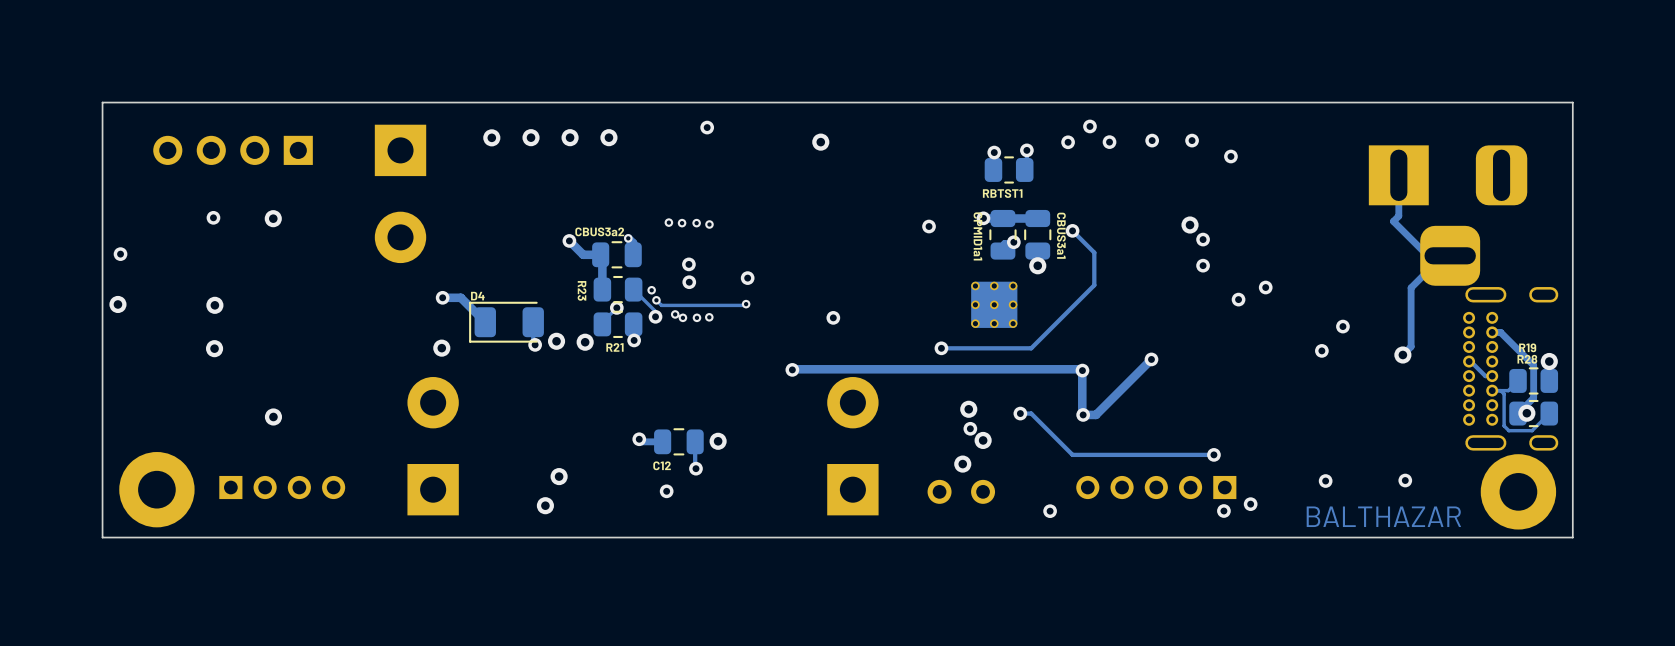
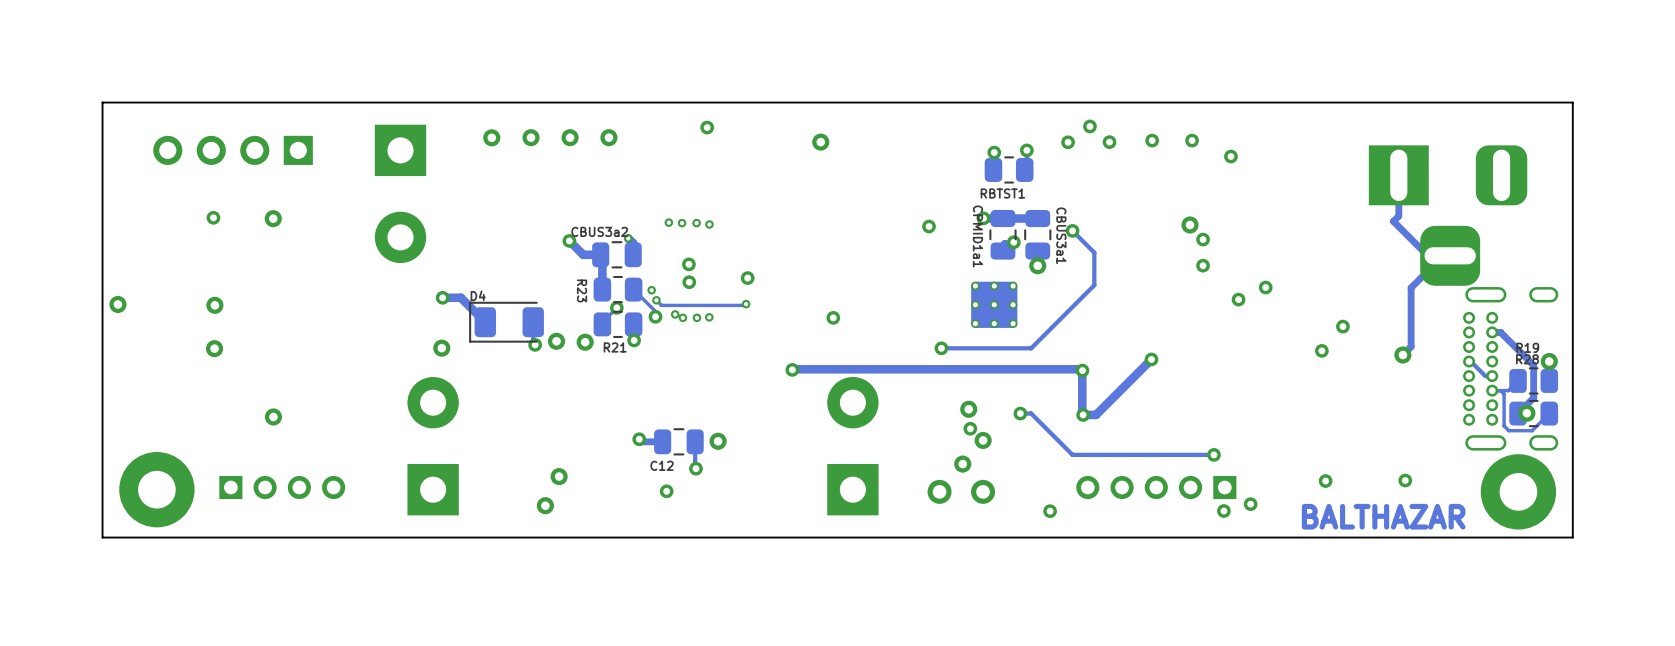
via: (120, 254) -> none

